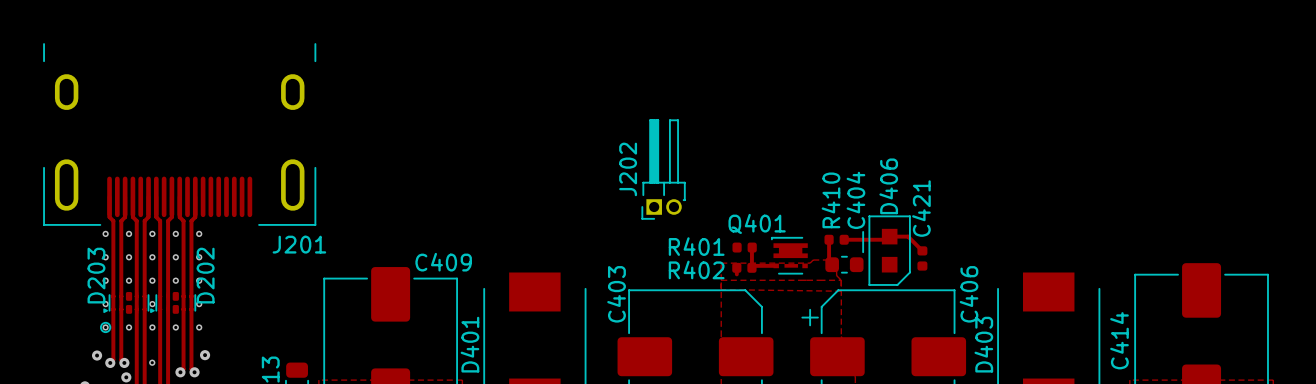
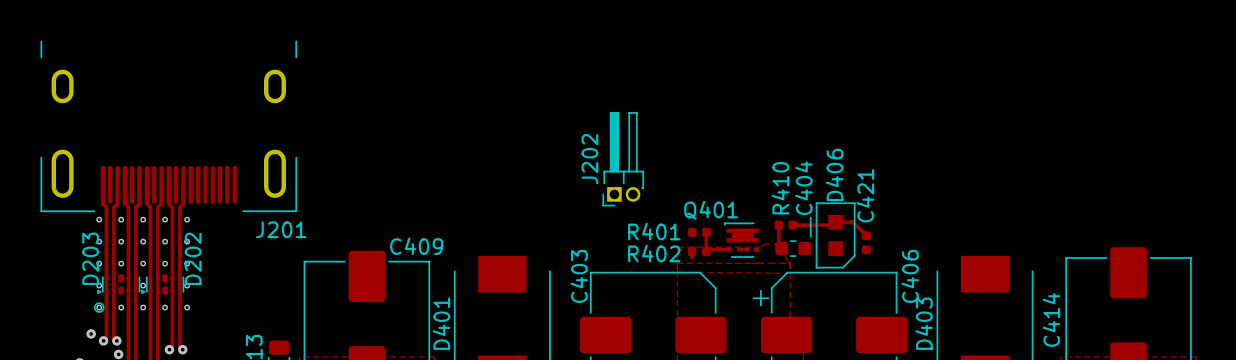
via: (205, 355) -> none
via: (152, 362) -> none

